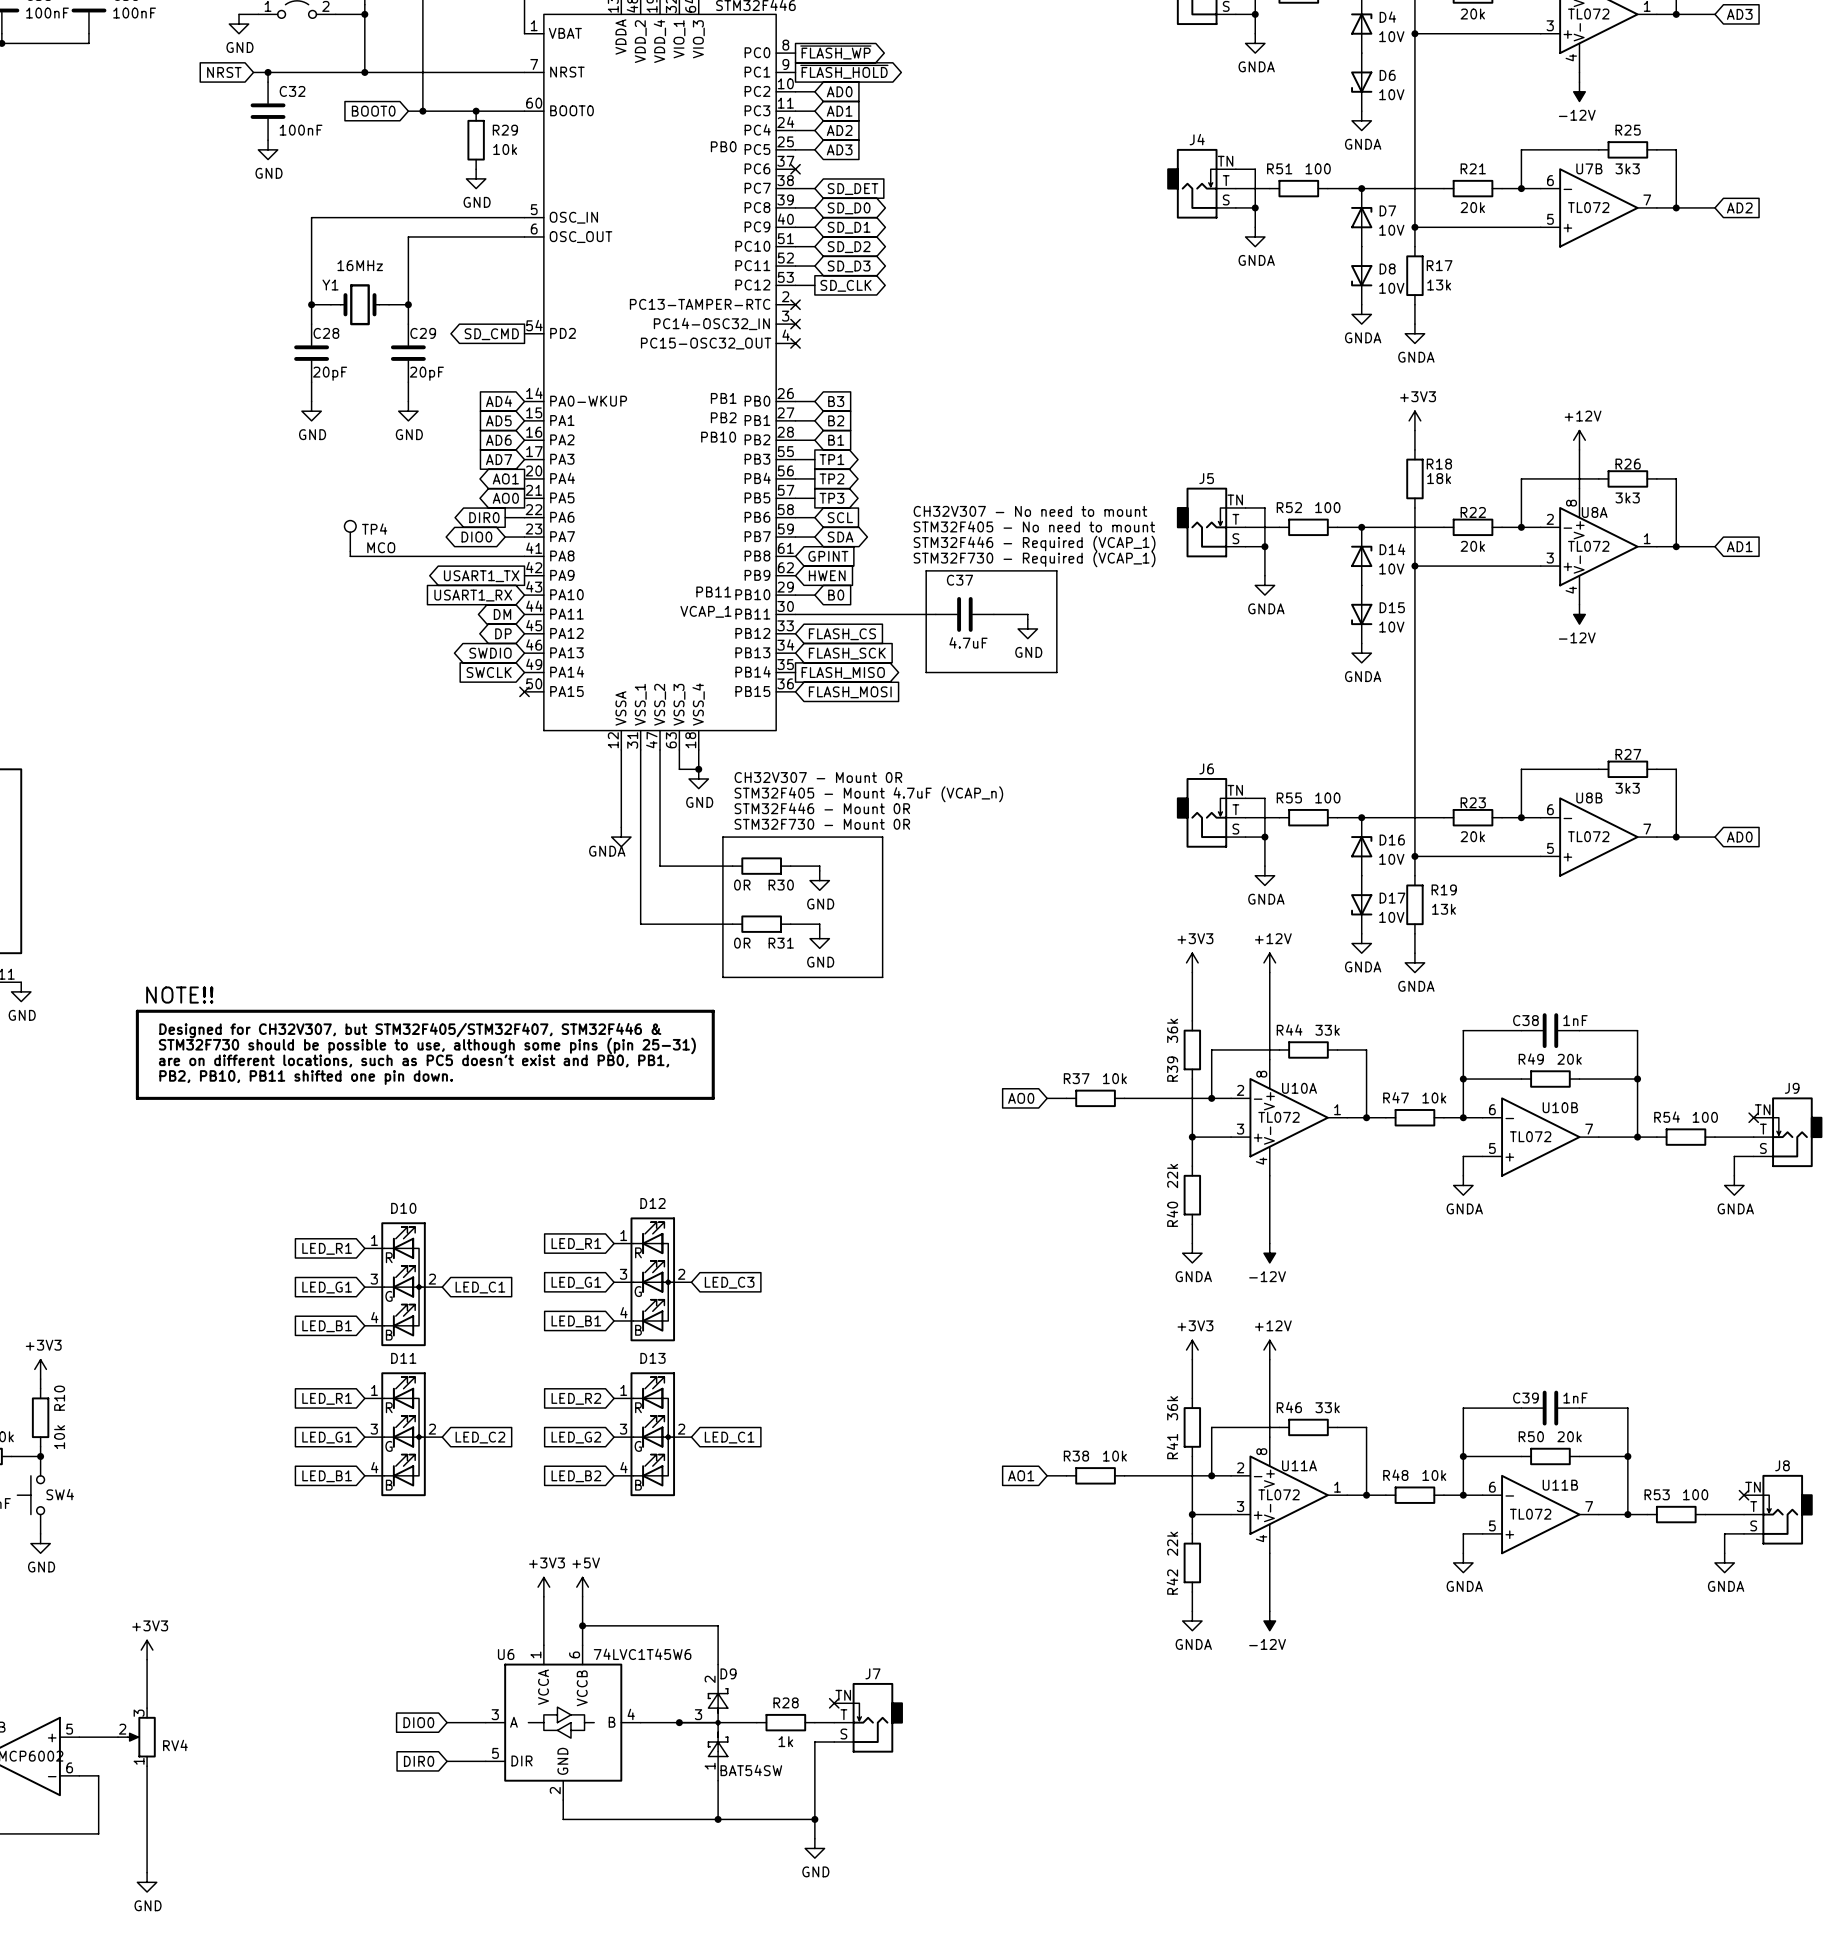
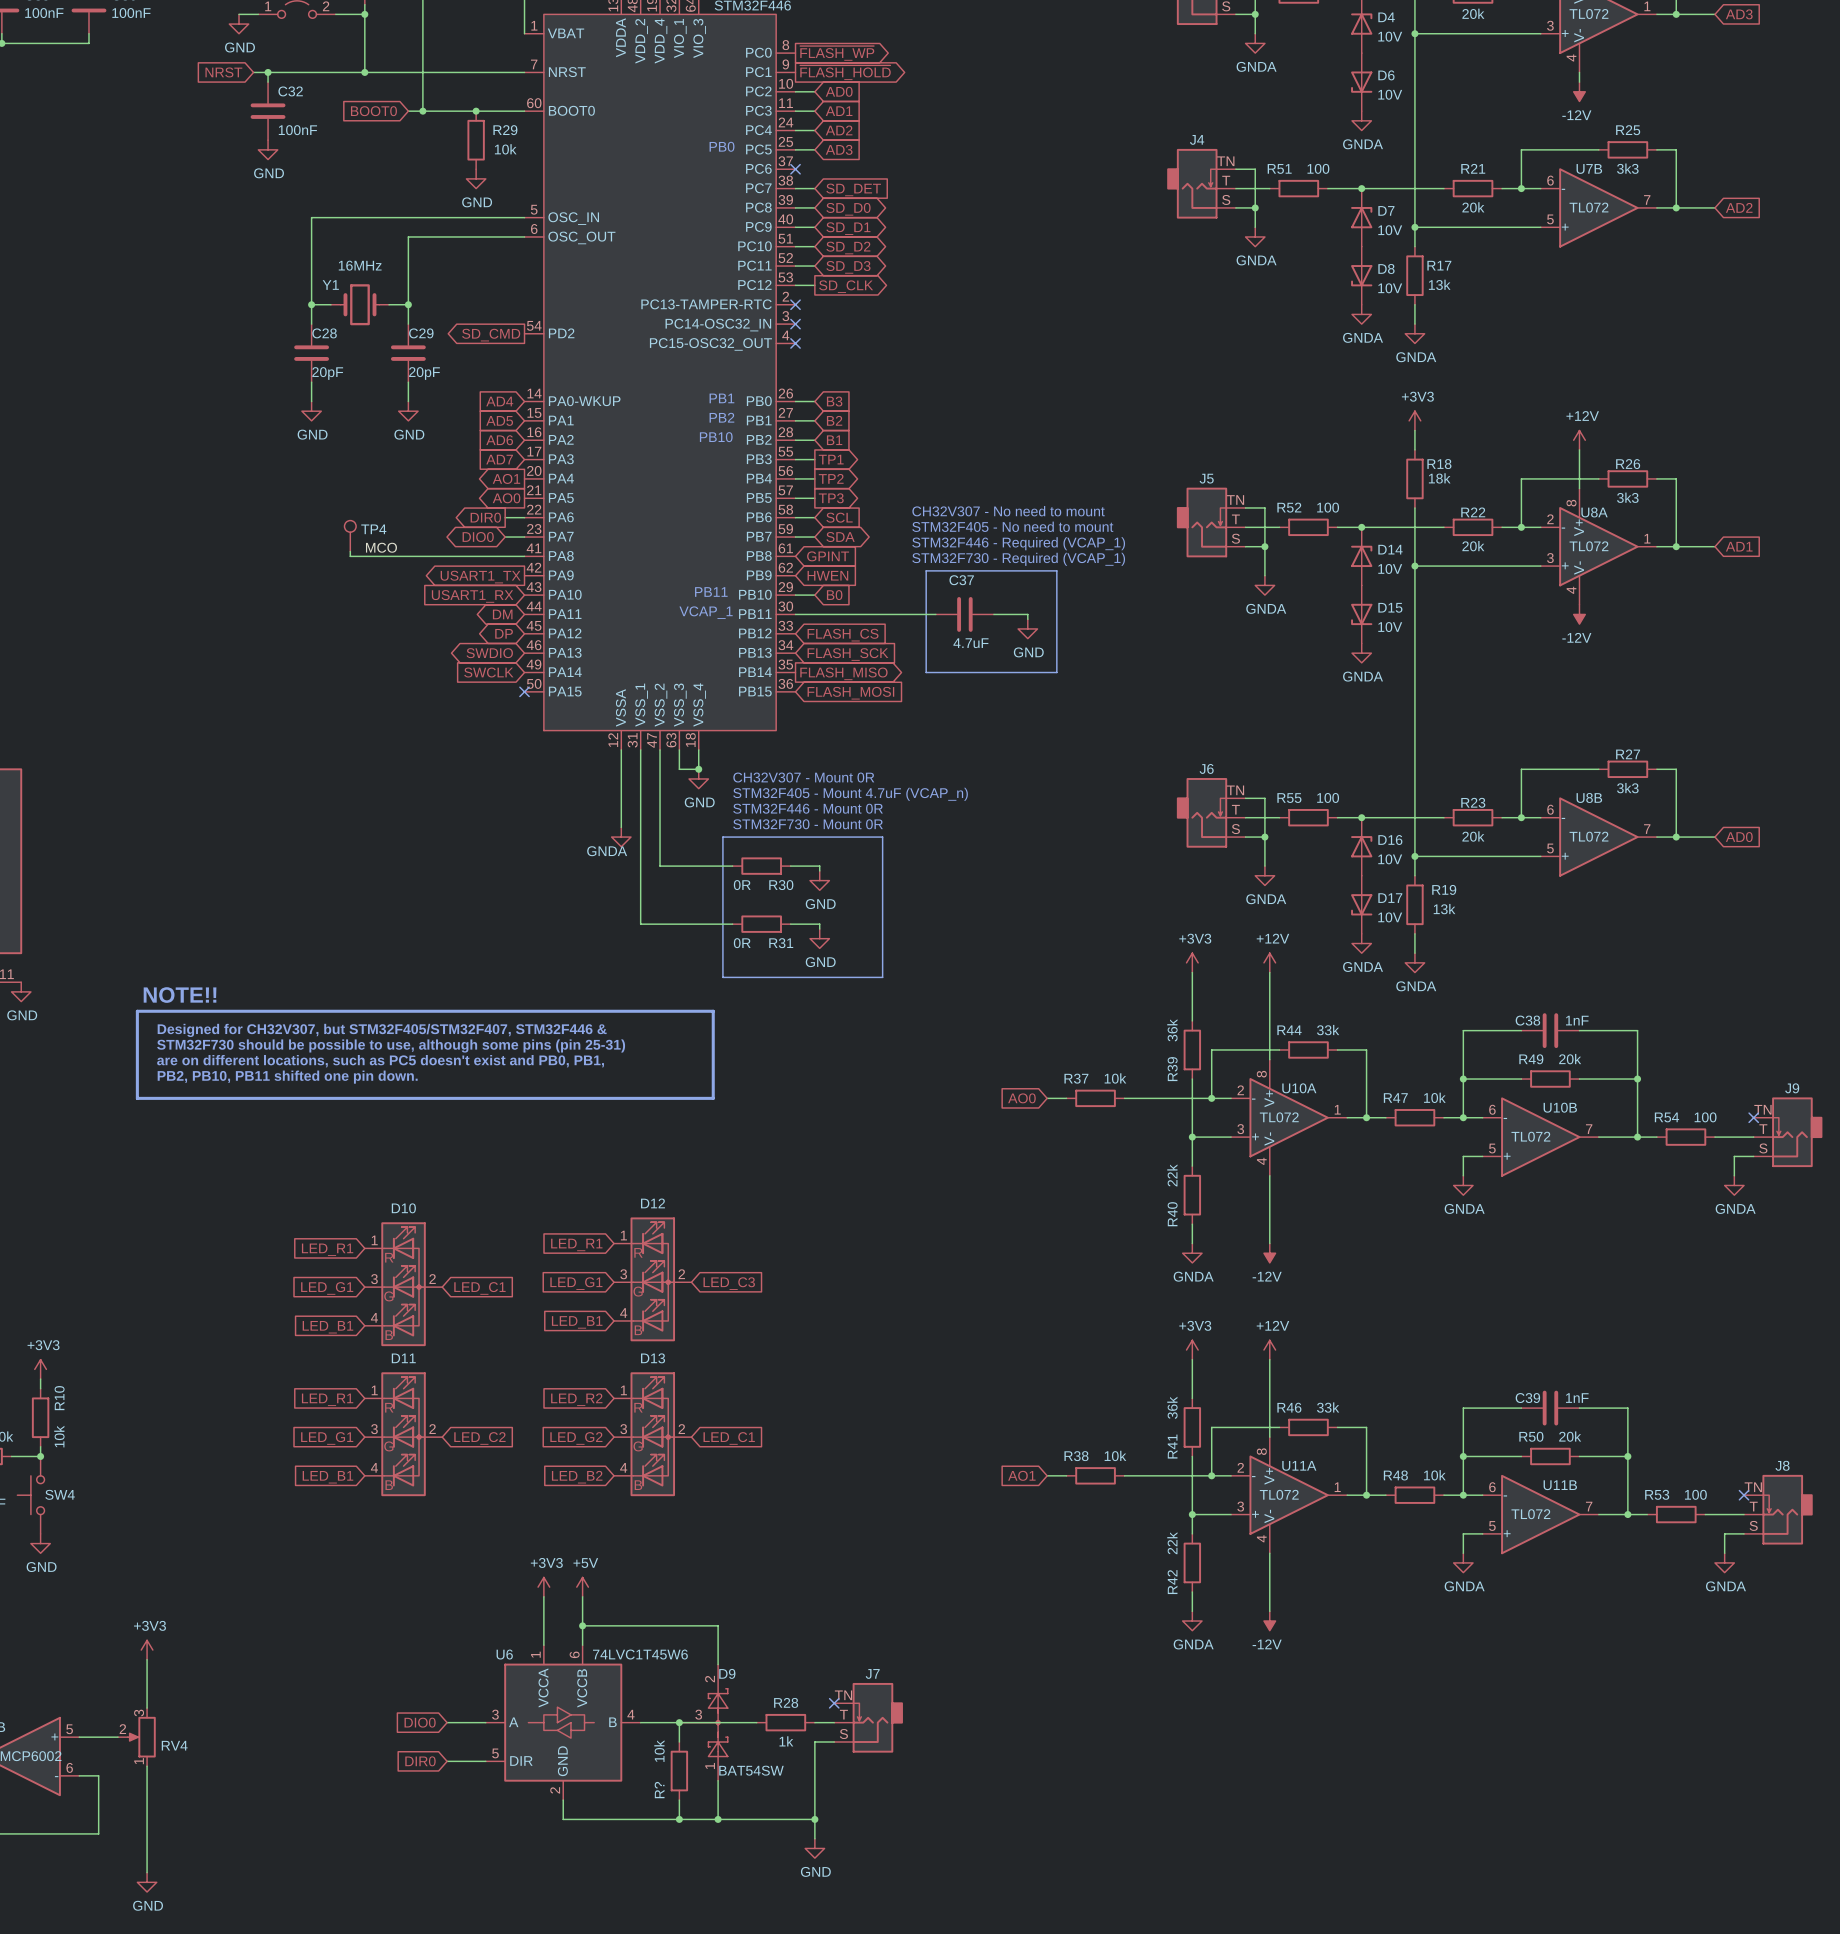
wire: none -> (679, 1722) (679, 1742)
R?: none -> 10k (679, 1771)
wire: none -> (679, 1800) (679, 1819)
junction: none -> (679, 1819)

